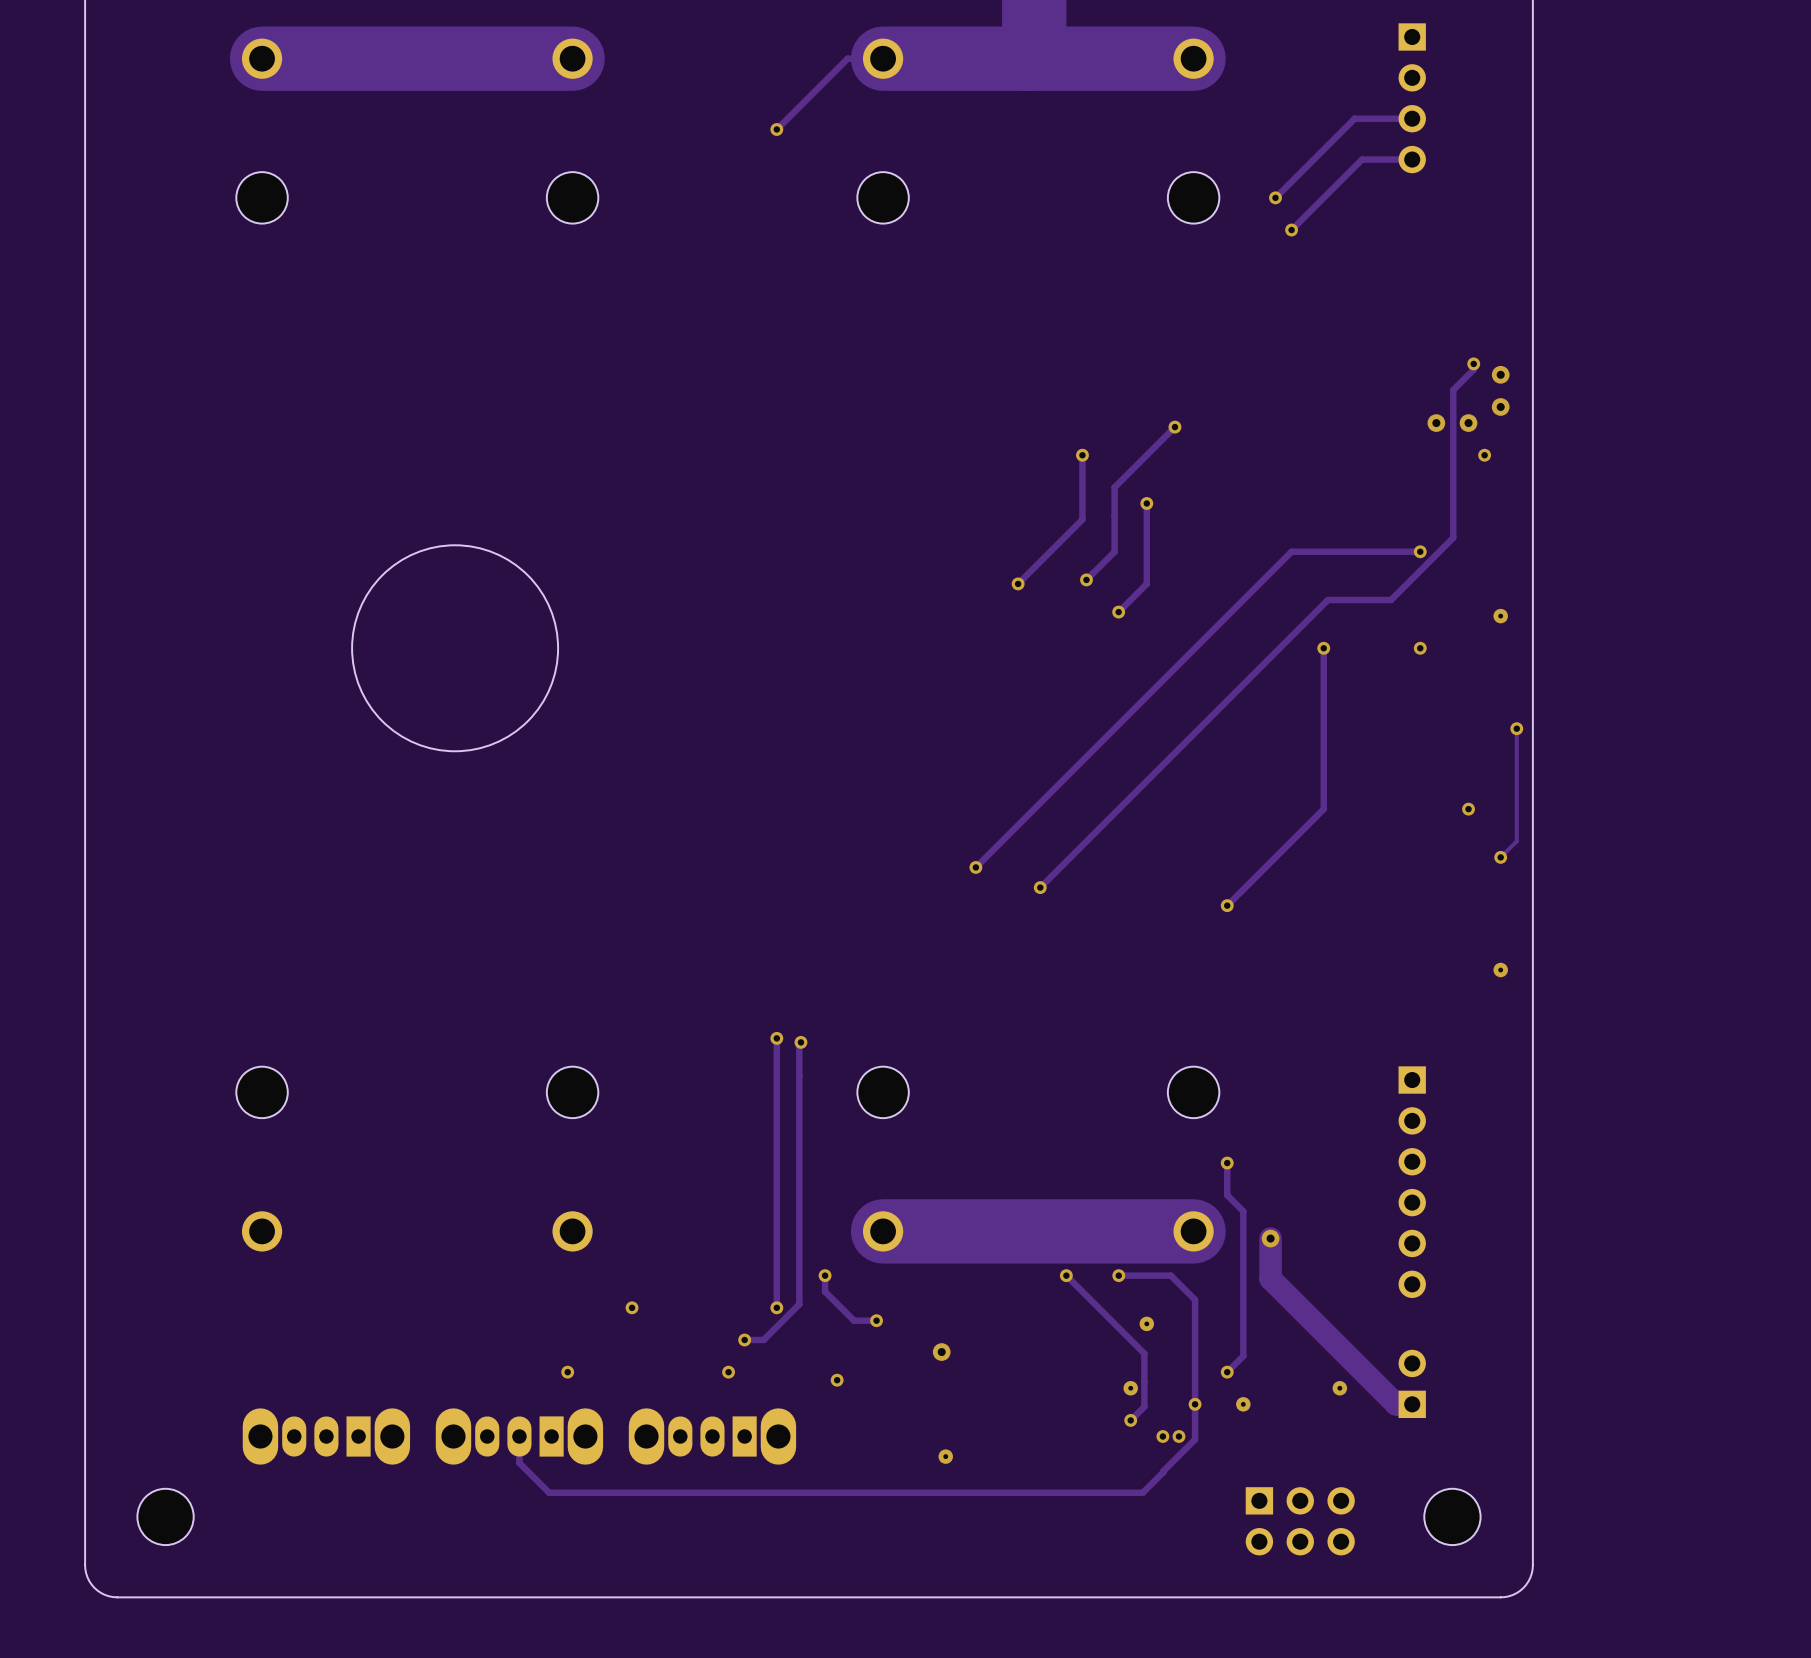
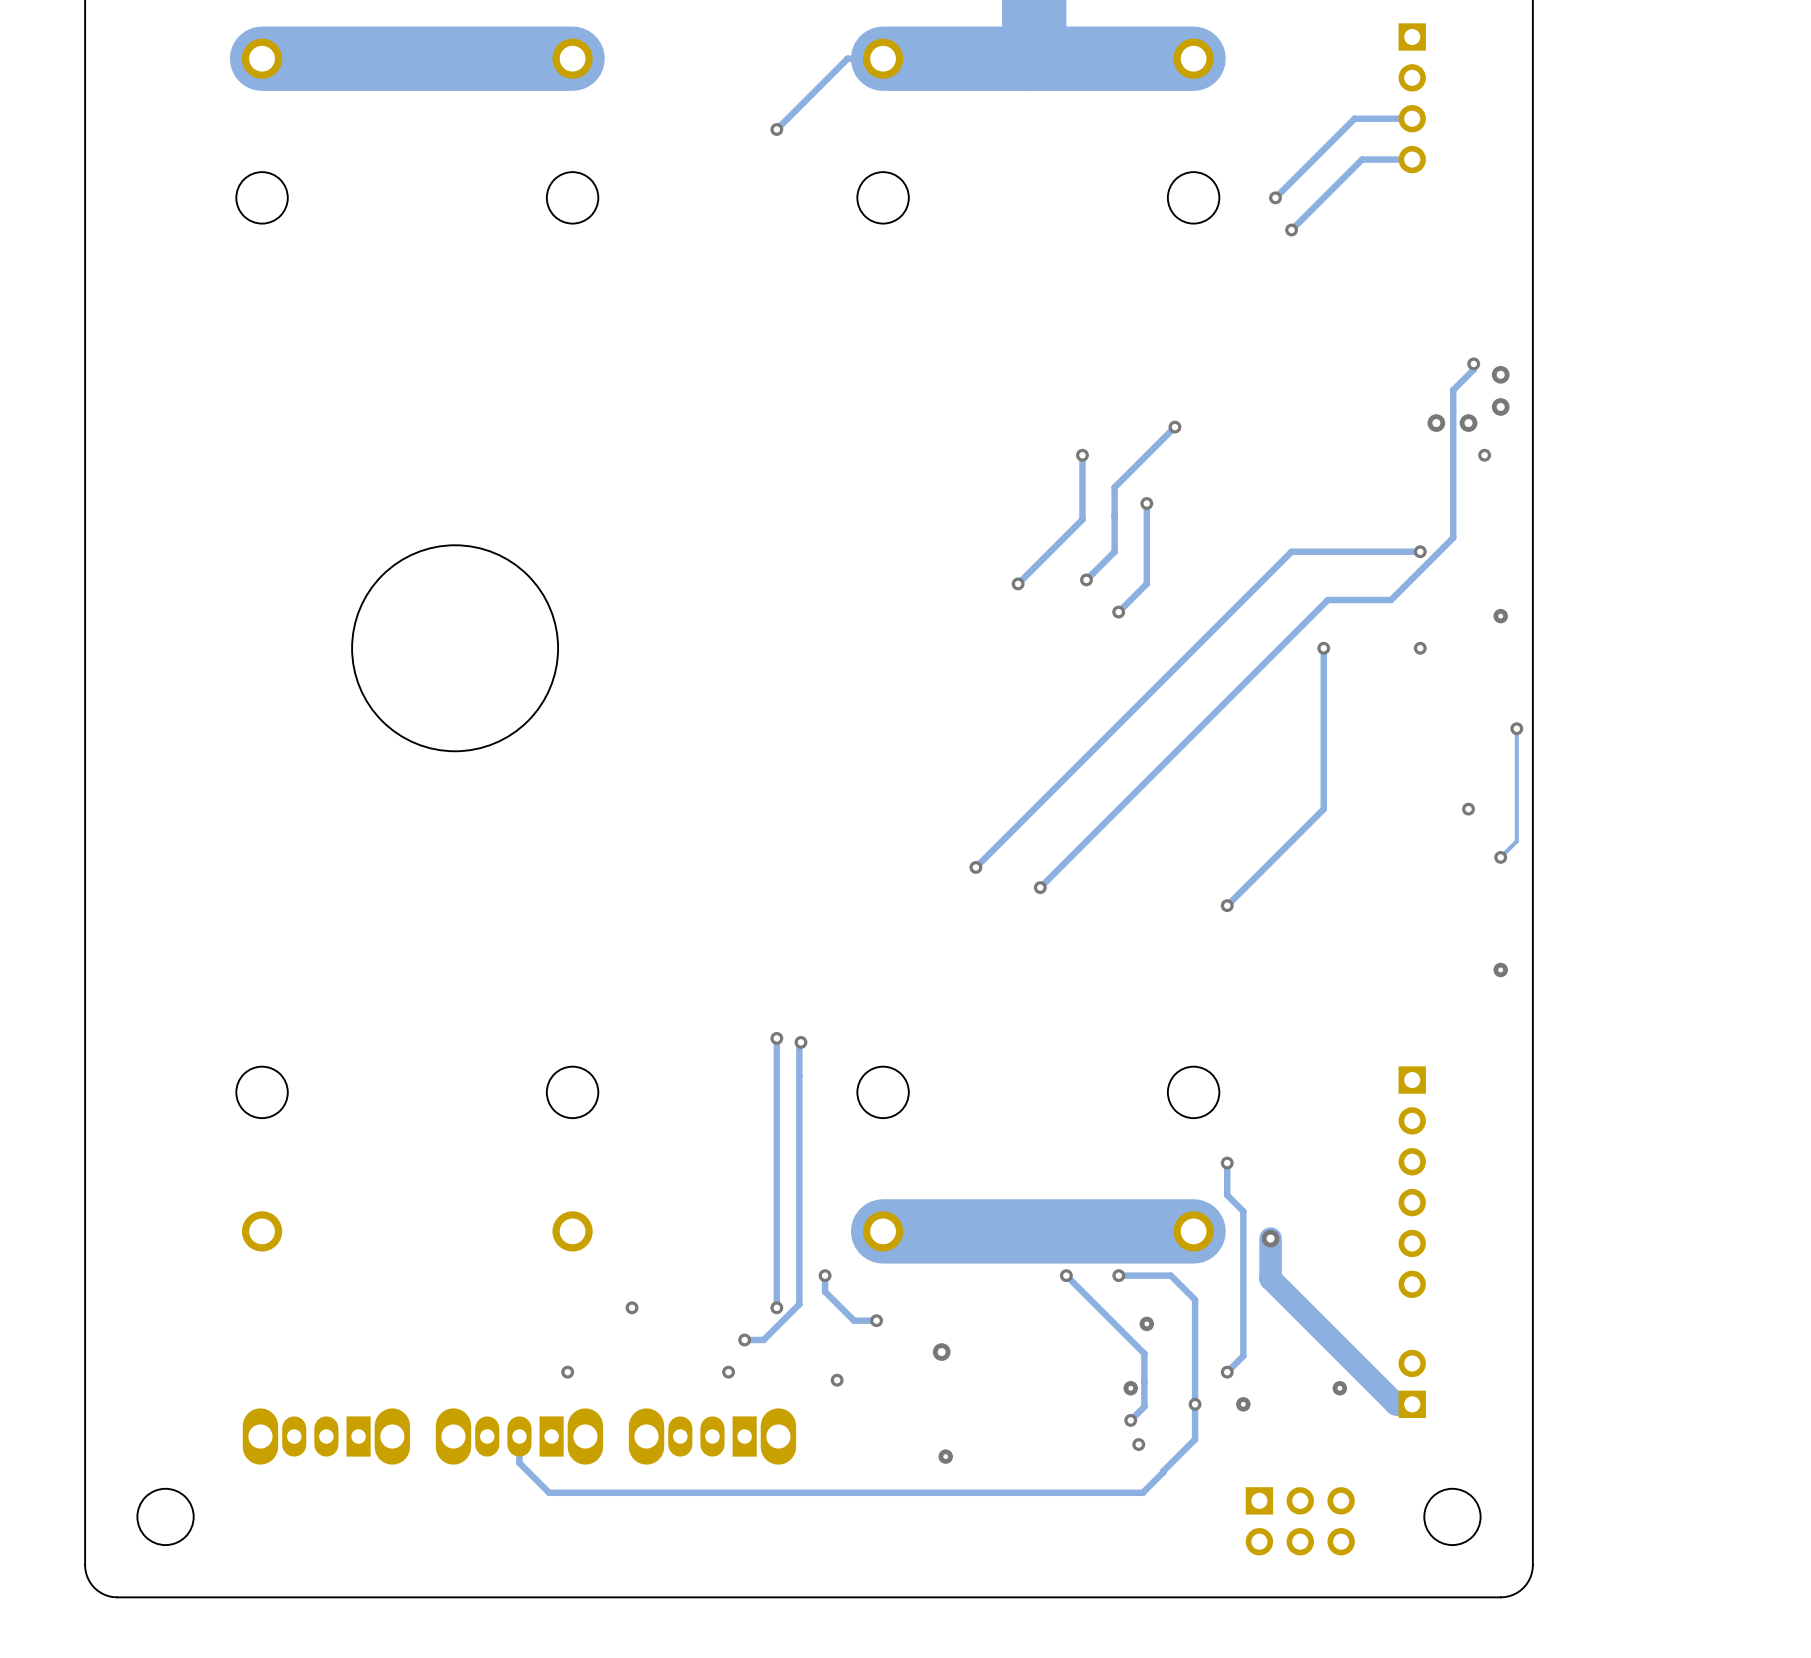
via: (1162, 1436) -> none
via: (1178, 1436) -> none
via: none -> (1138, 1444)

